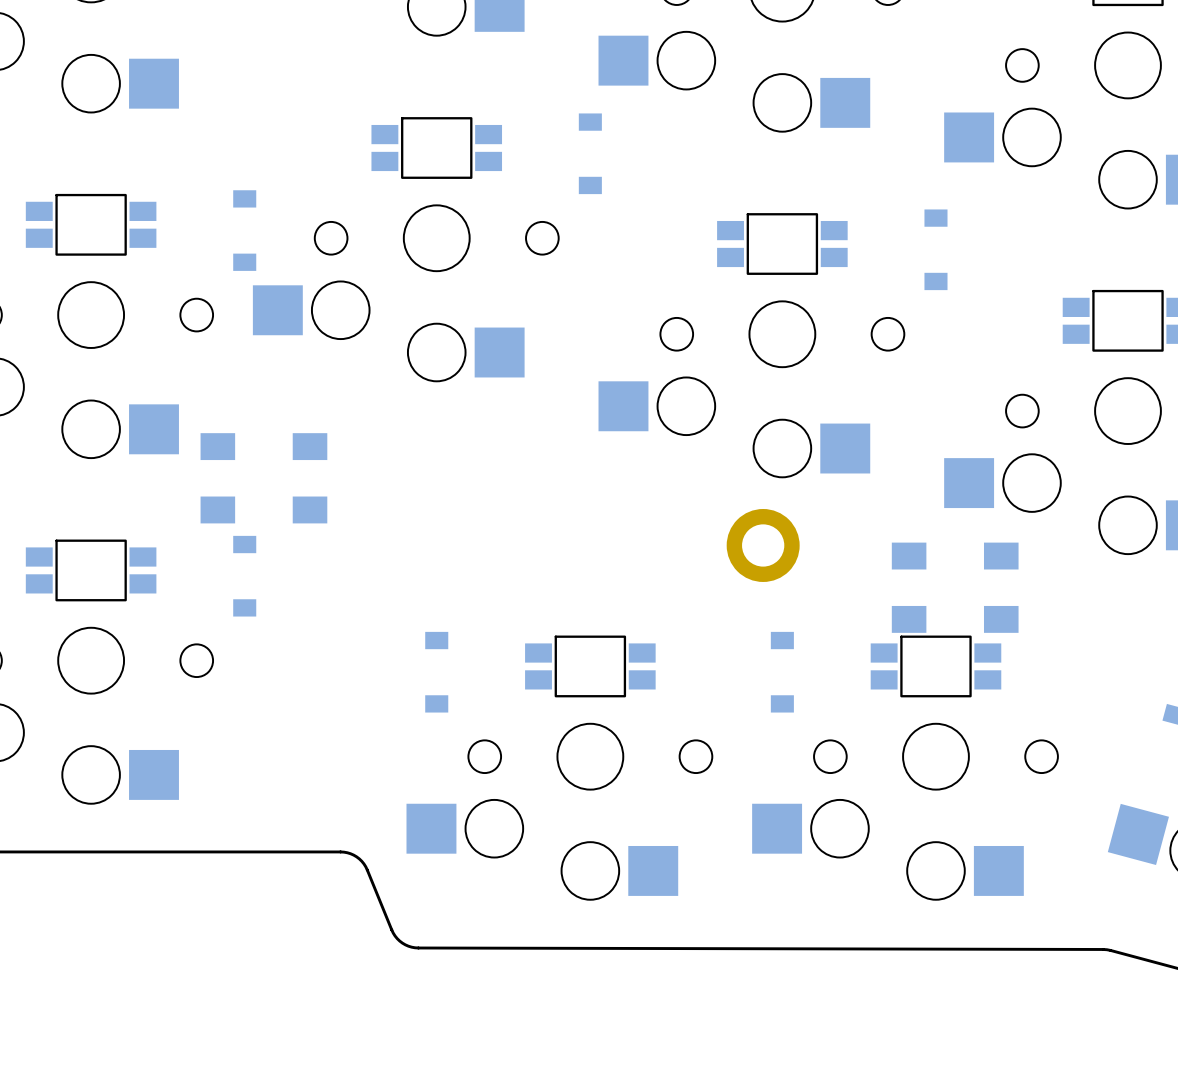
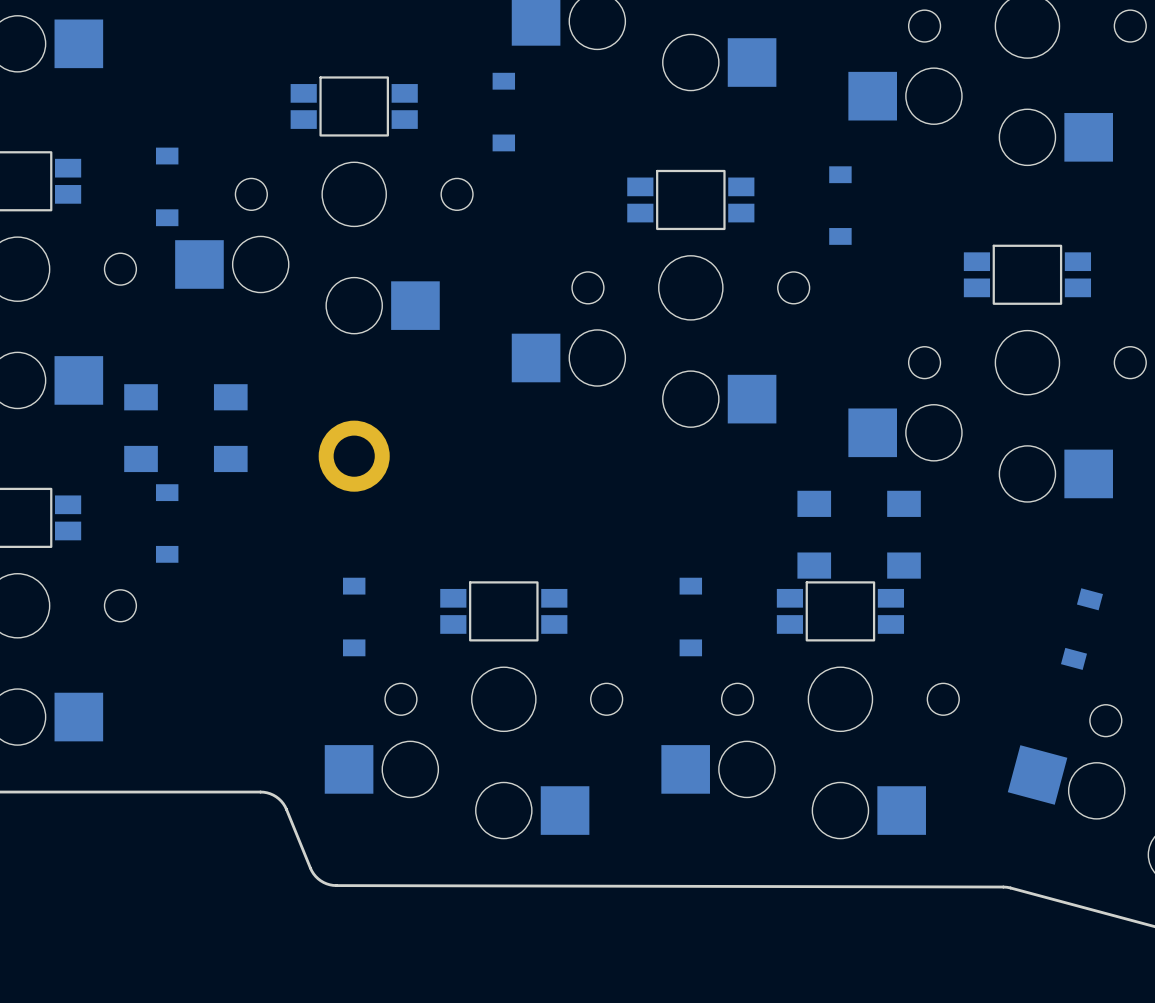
part position: (763, 545) -> (354, 456)

